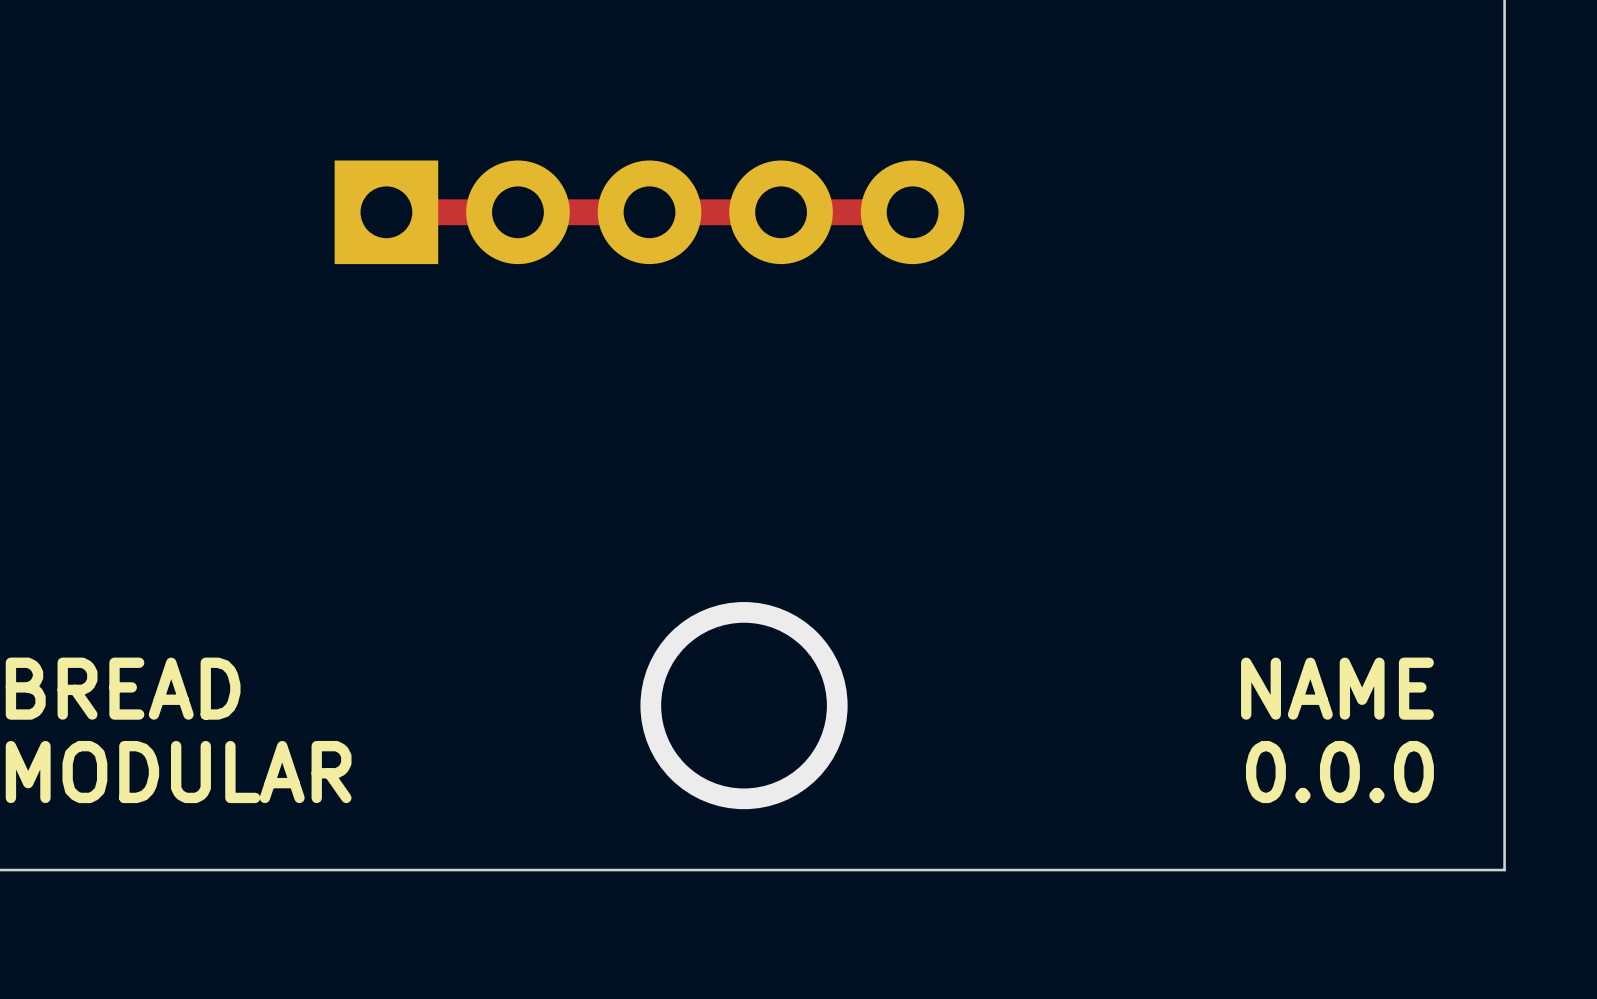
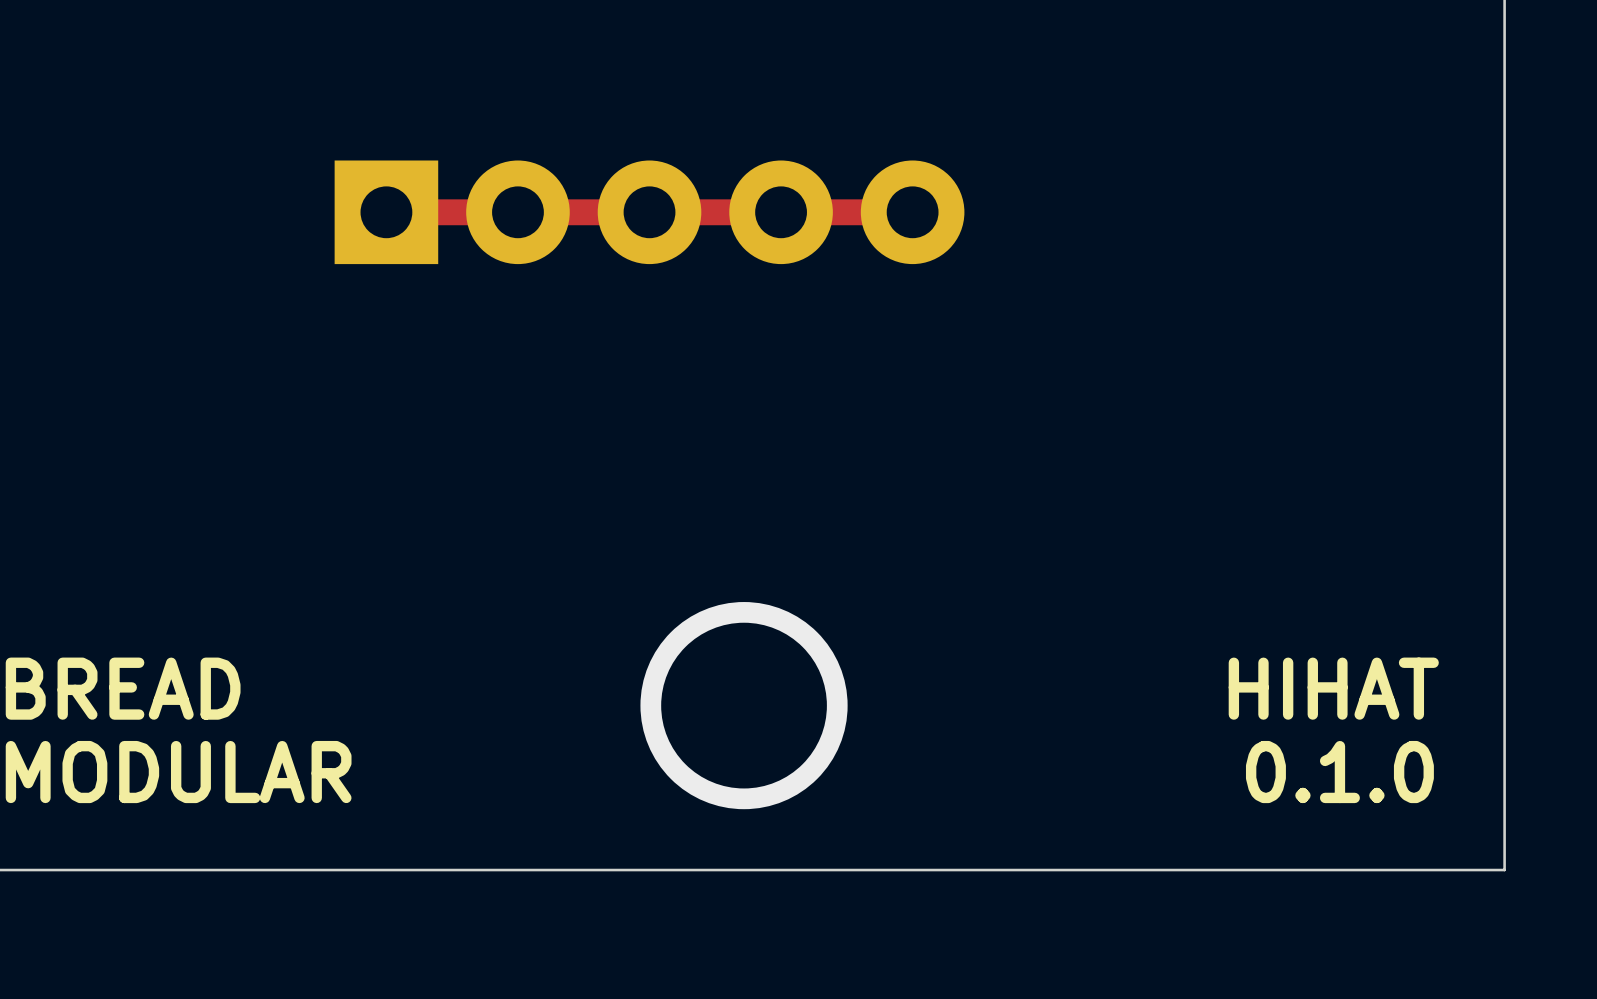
text: NAME (1337, 688) -> HIHAT (1333, 688)
text: 0.0.0 (1339, 772) -> 0.1.0 (1339, 772)

